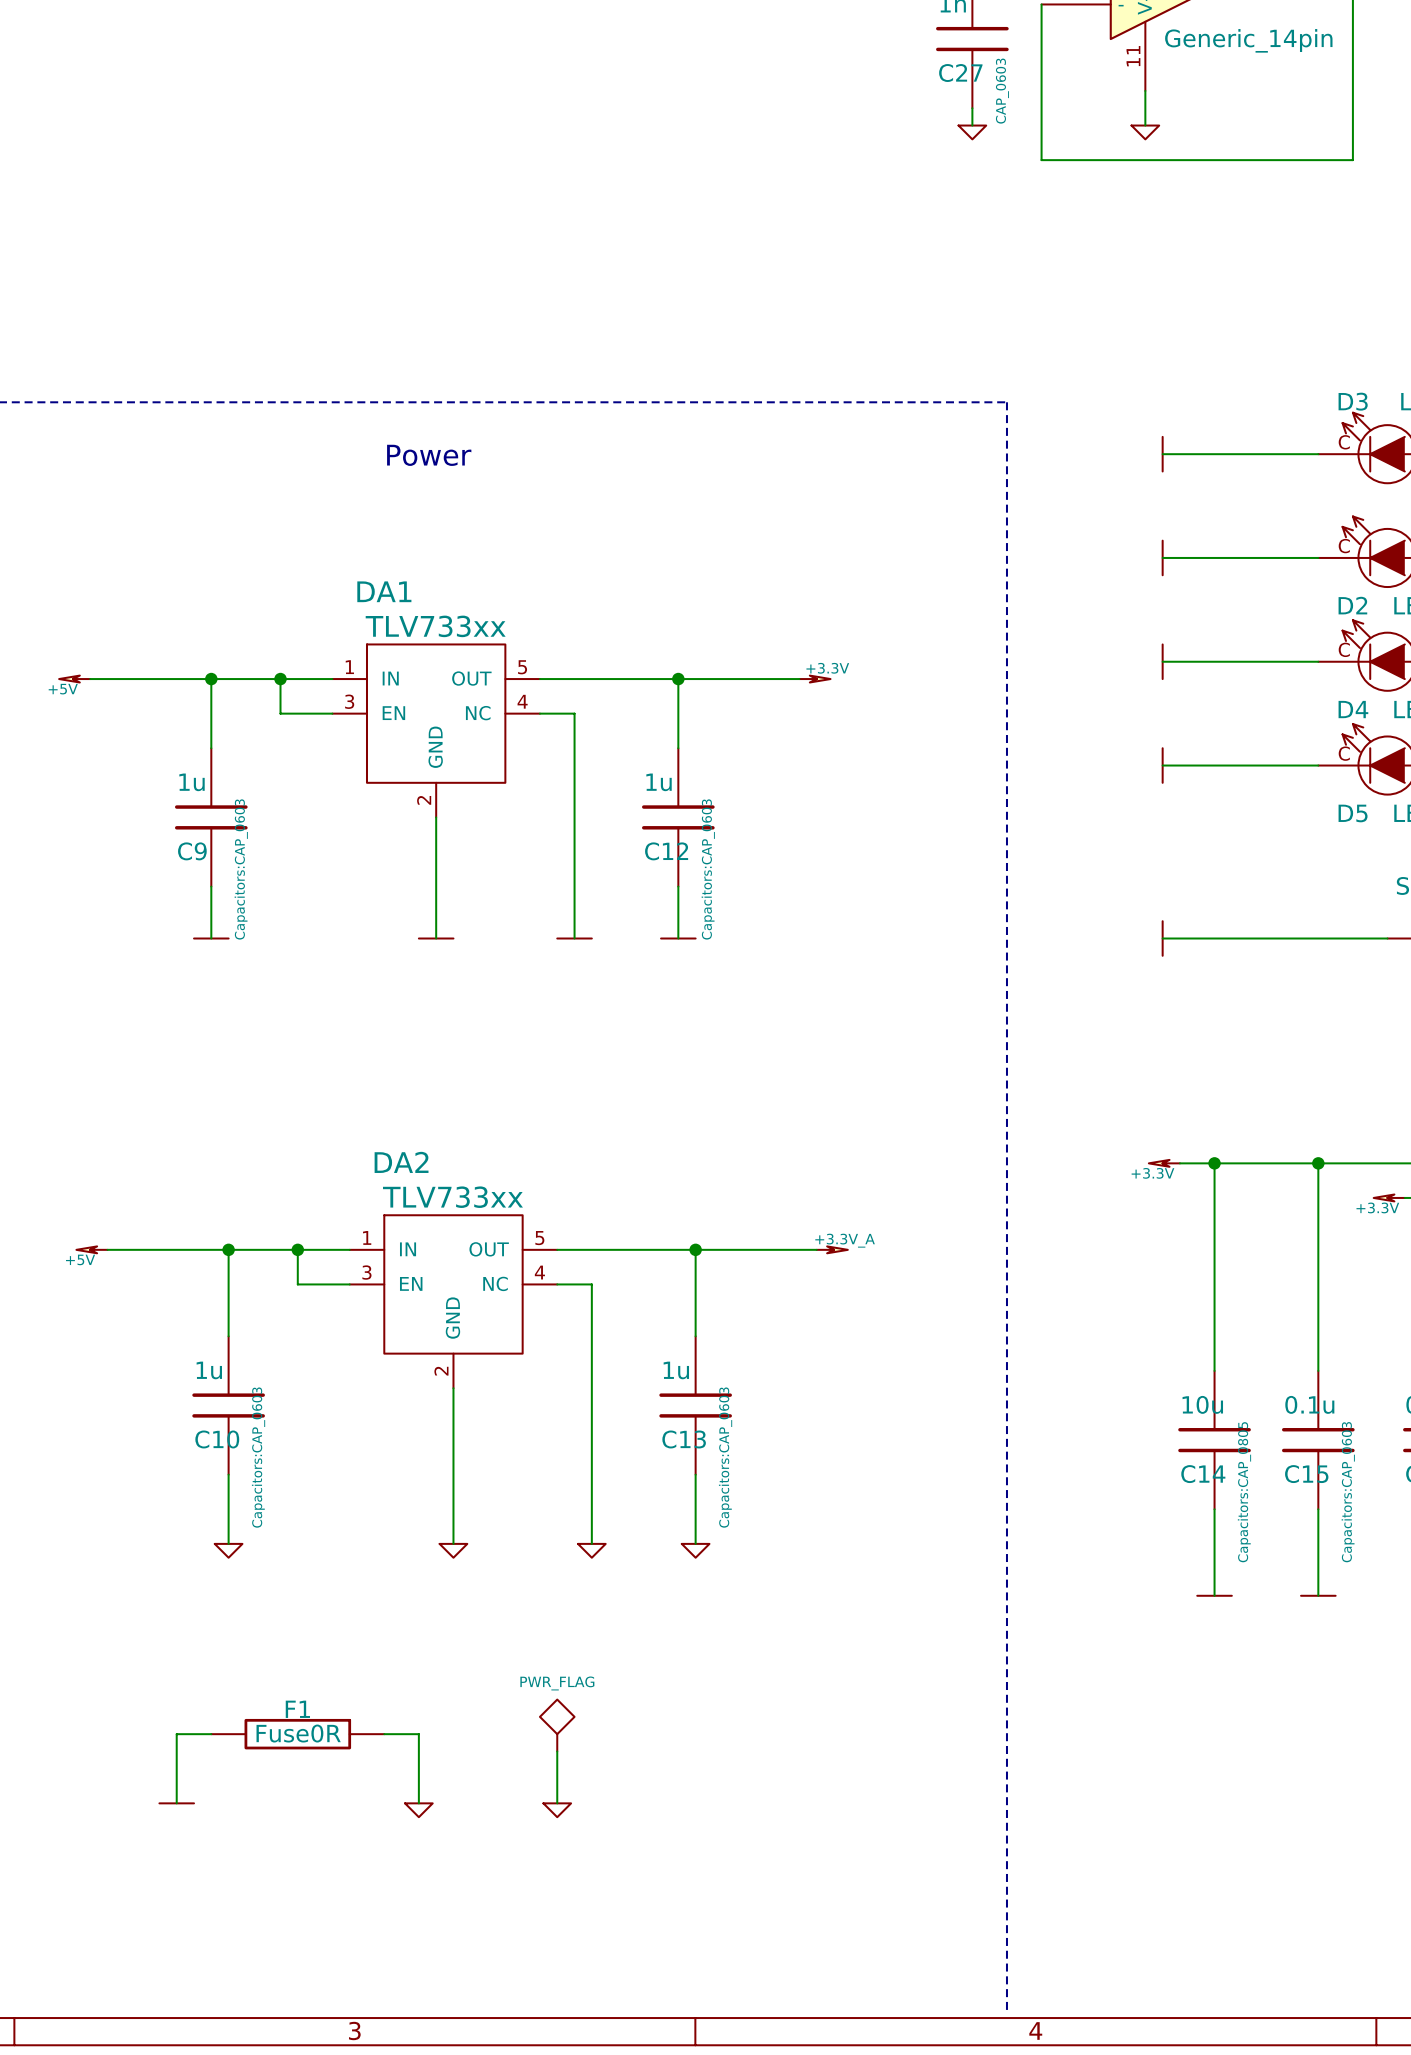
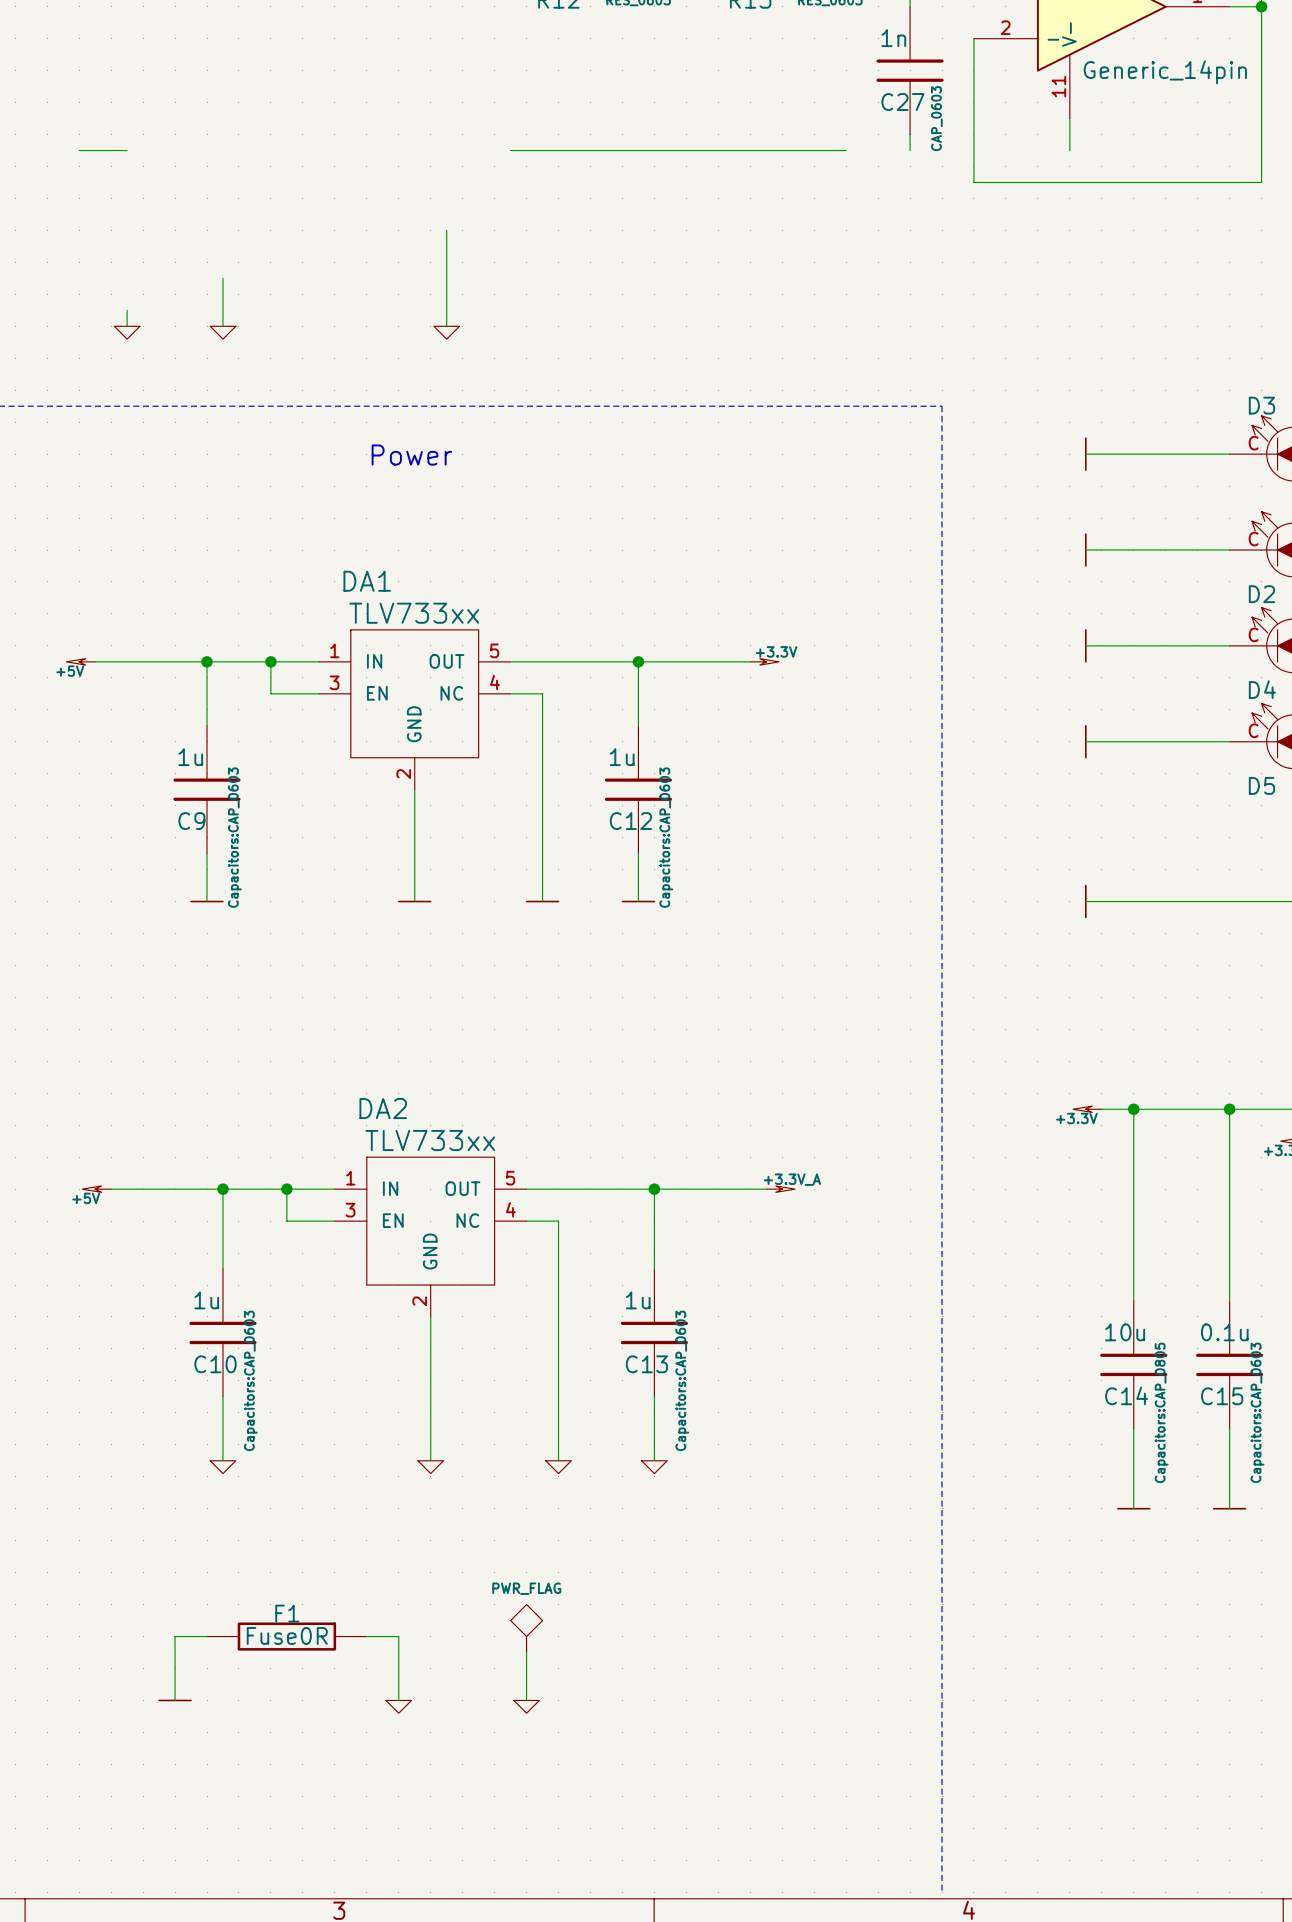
wire: none -> (79, 150) (127, 150)
wire: none -> (510, 150) (846, 150)
power symbol: (972, 132) -> none
power symbol: (1145, 132) -> none
wire: none -> (446, 230) (446, 326)
wire: none -> (222, 278) (222, 326)
wire: none -> (127, 310) (127, 326)
power symbol: none -> (127, 332)
power symbol: none -> (222, 332)
power symbol: none -> (446, 332)

